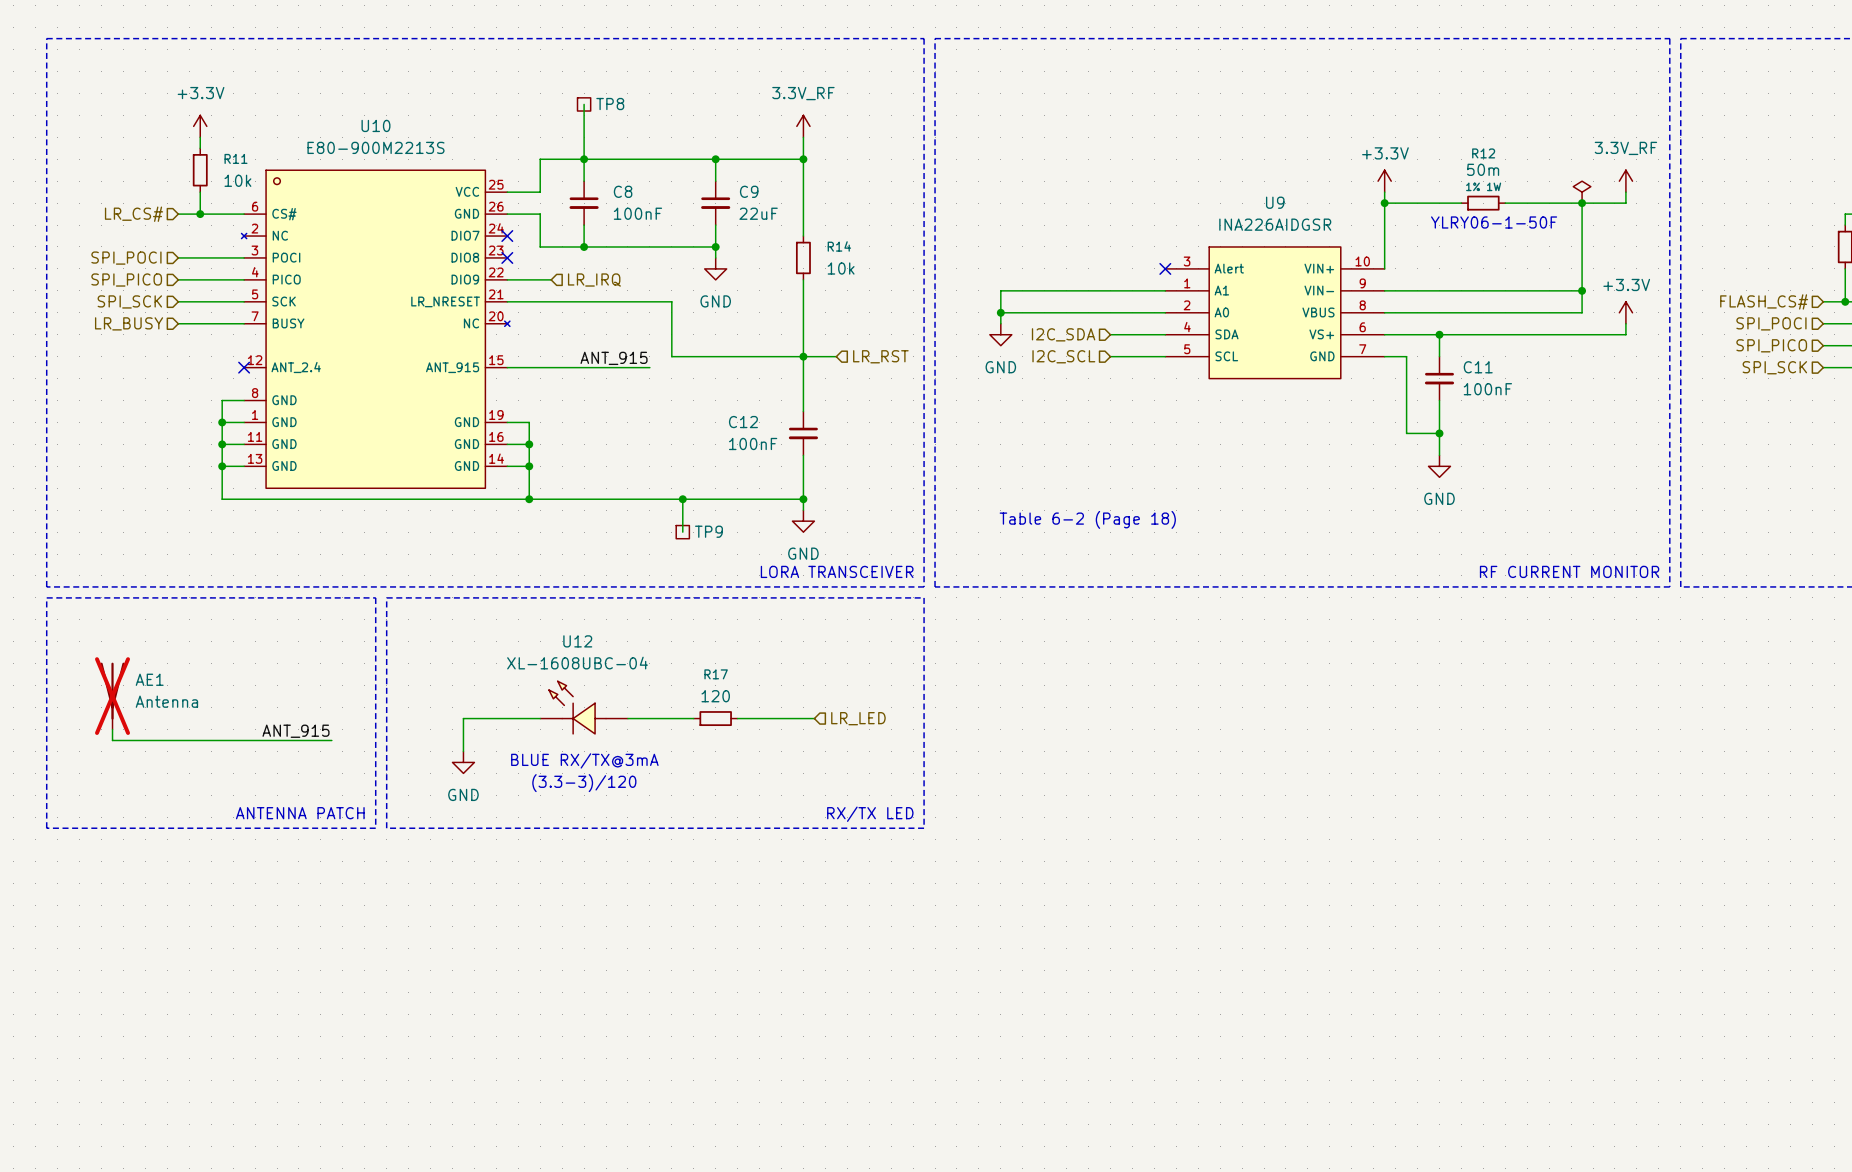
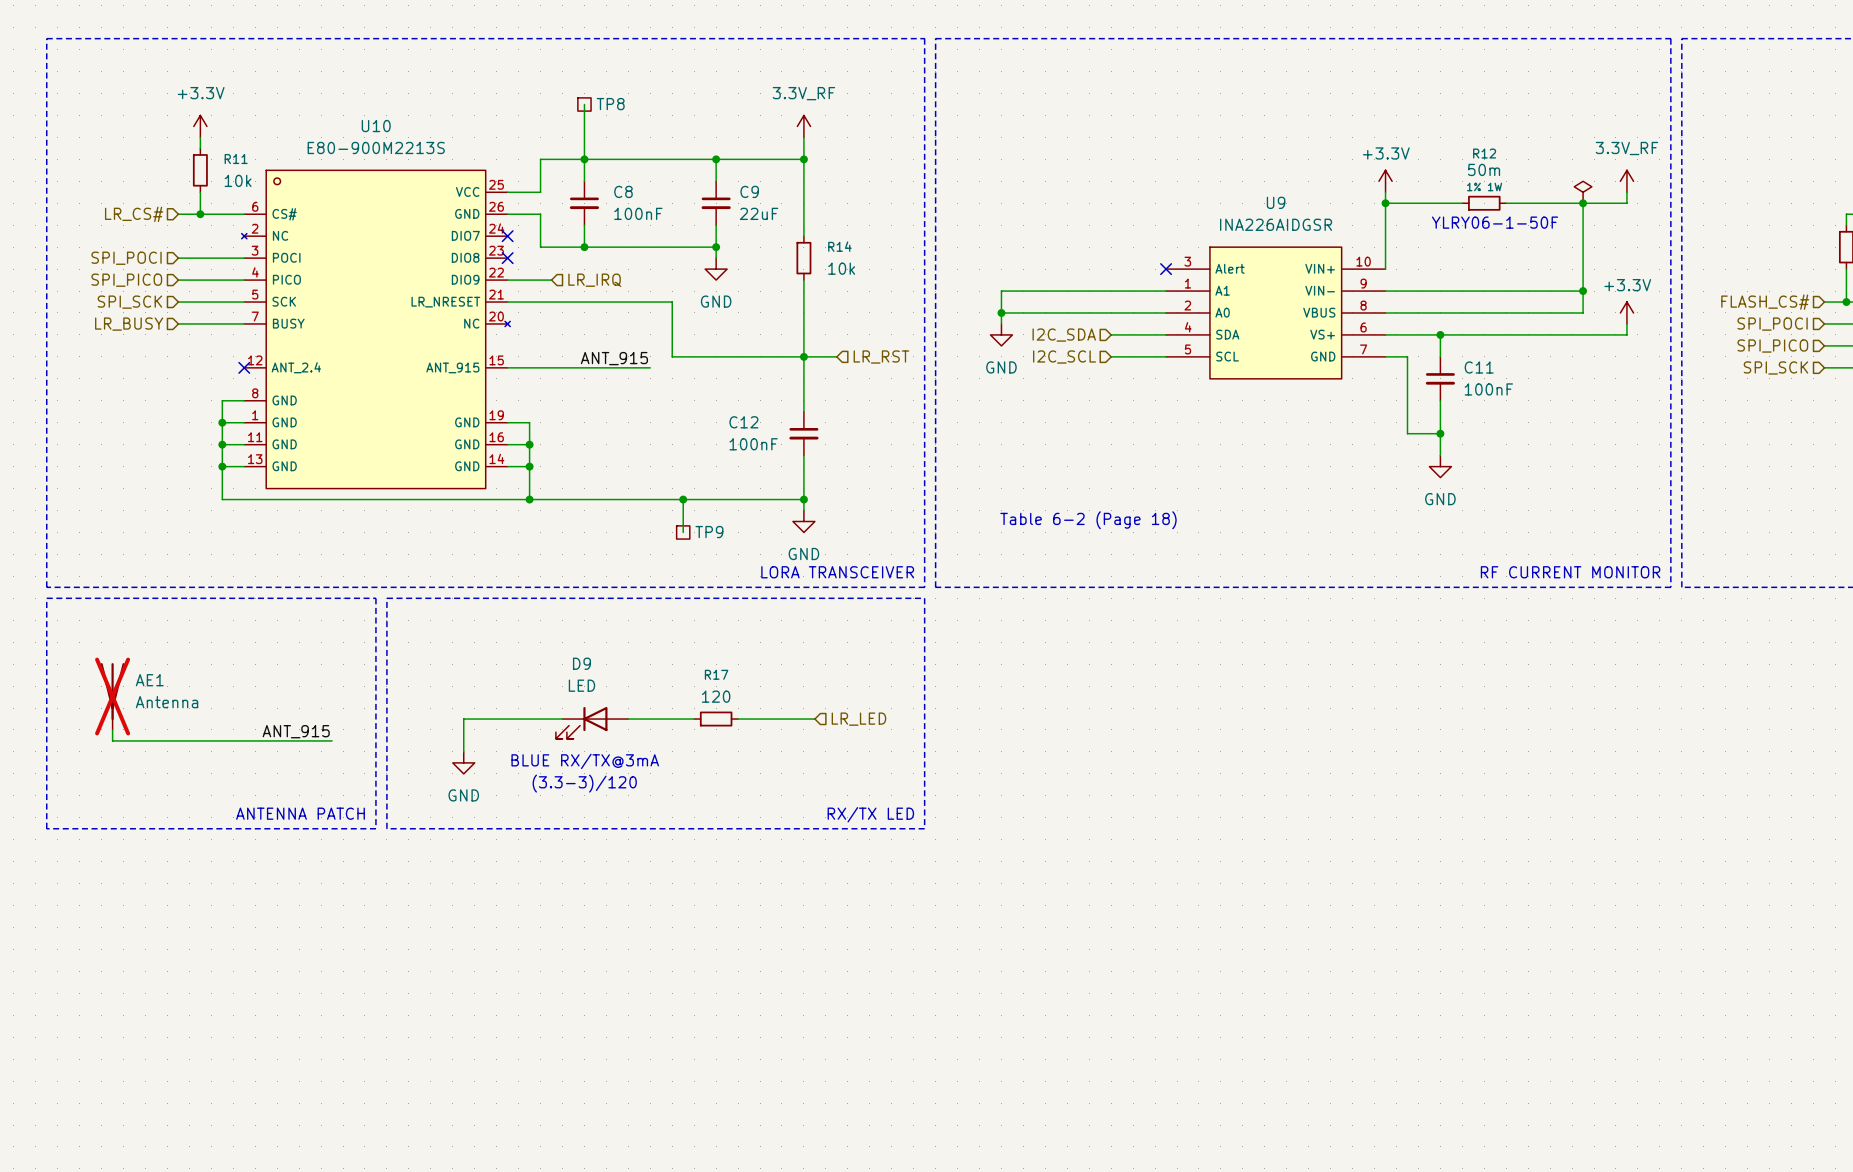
U12: XL-1608UBC-04 (584, 707) -> none
D9: none -> LED (592, 722)

